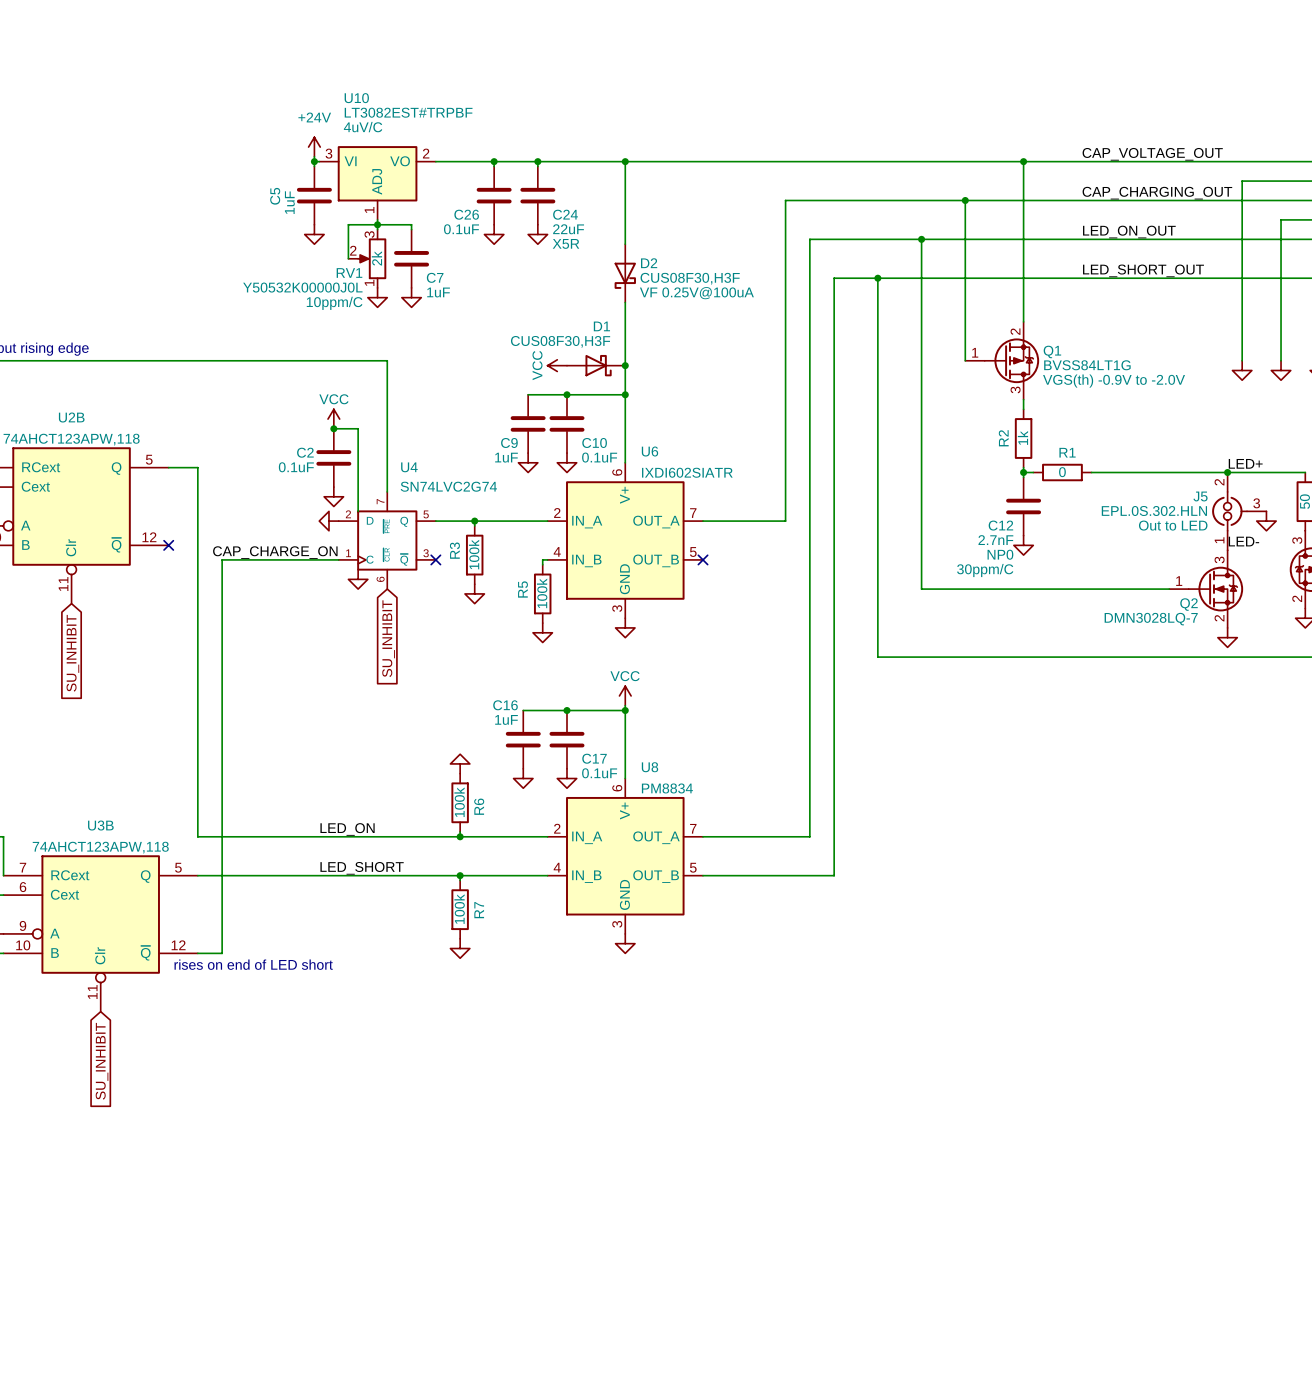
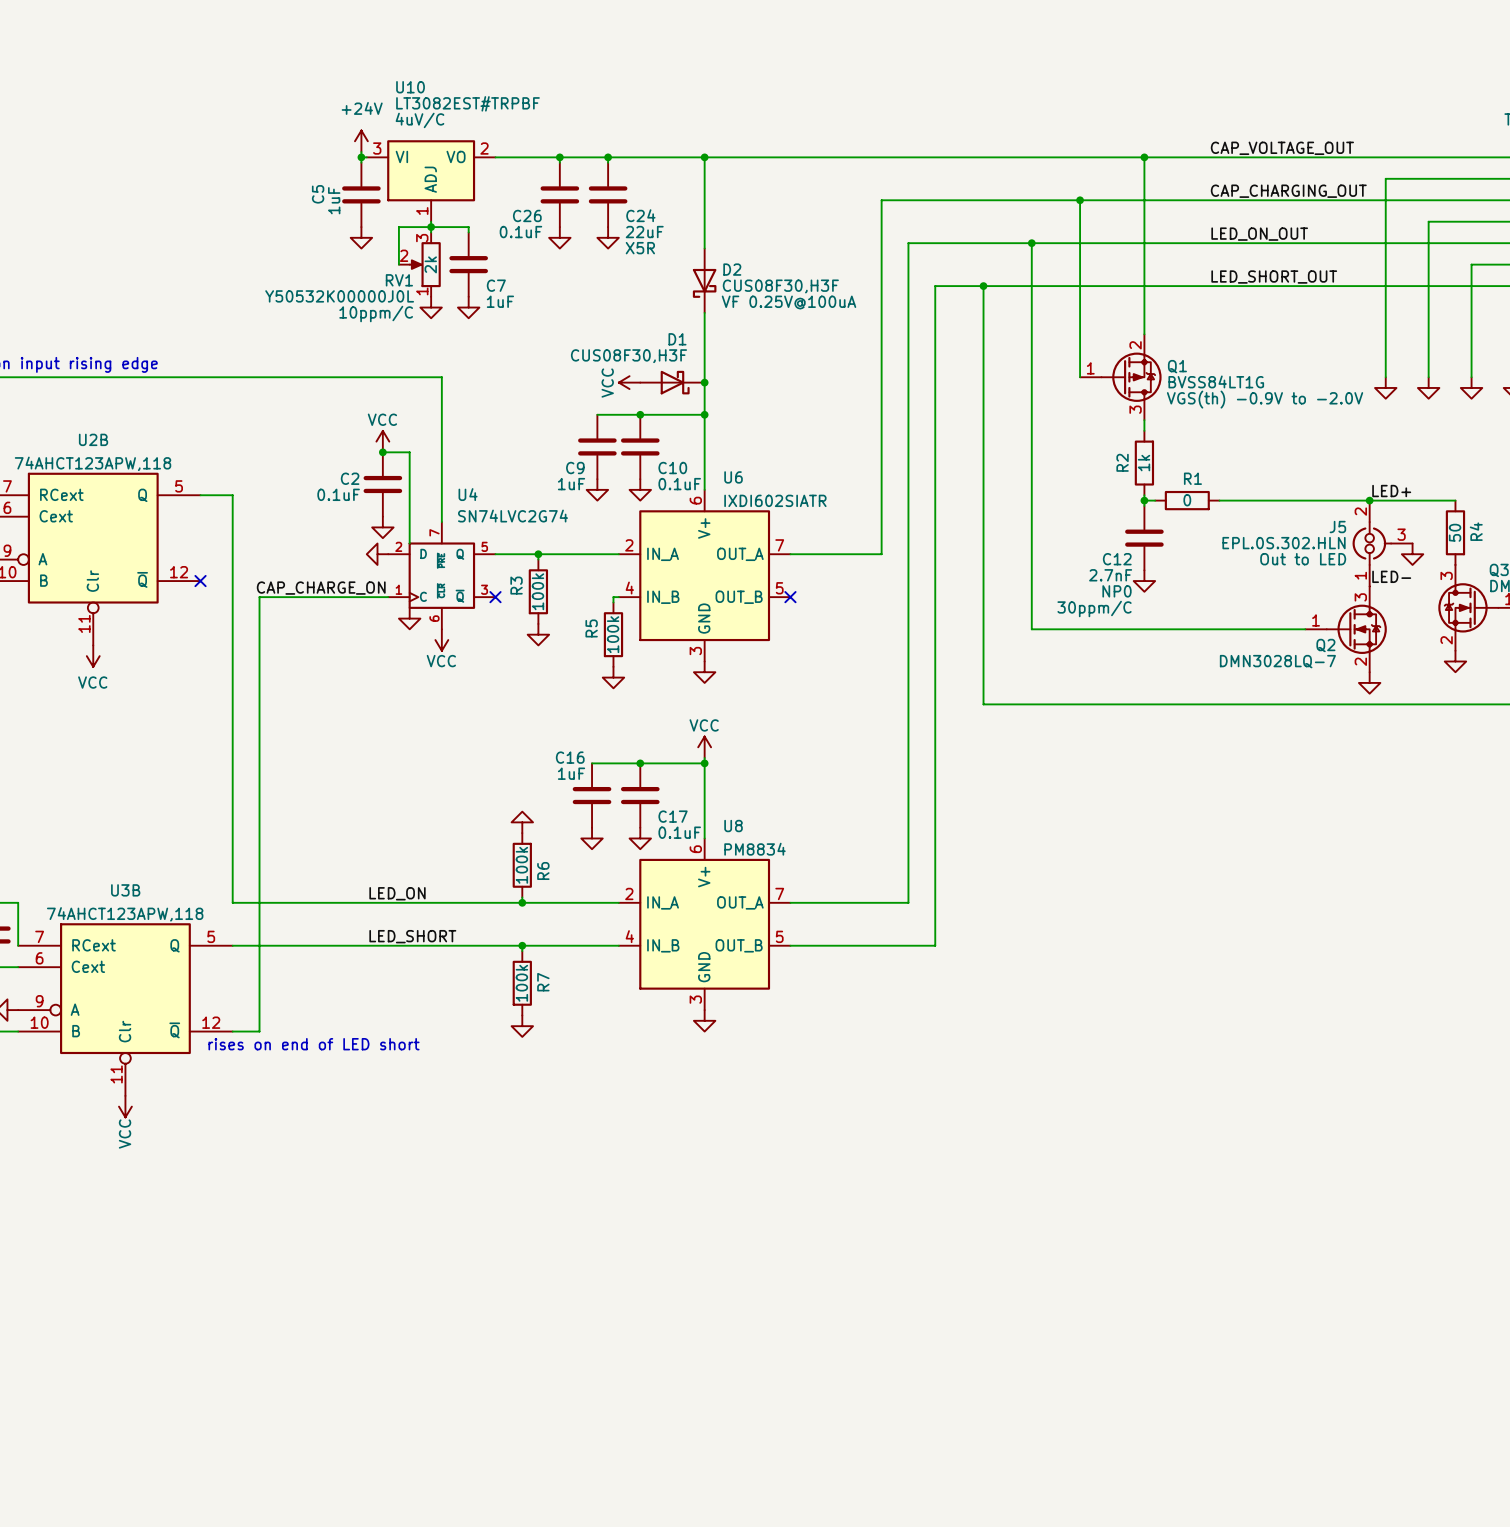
power symbol: none -> VCC (441, 640)
power symbol: none -> VCC (93, 656)
global label: SU_INHIBIT (388, 638) -> none
global label: SU_INHIBIT (72, 653) -> none
power symbol: none -> VCC (125, 1106)
global label: SU_INHIBIT (102, 1061) -> none

